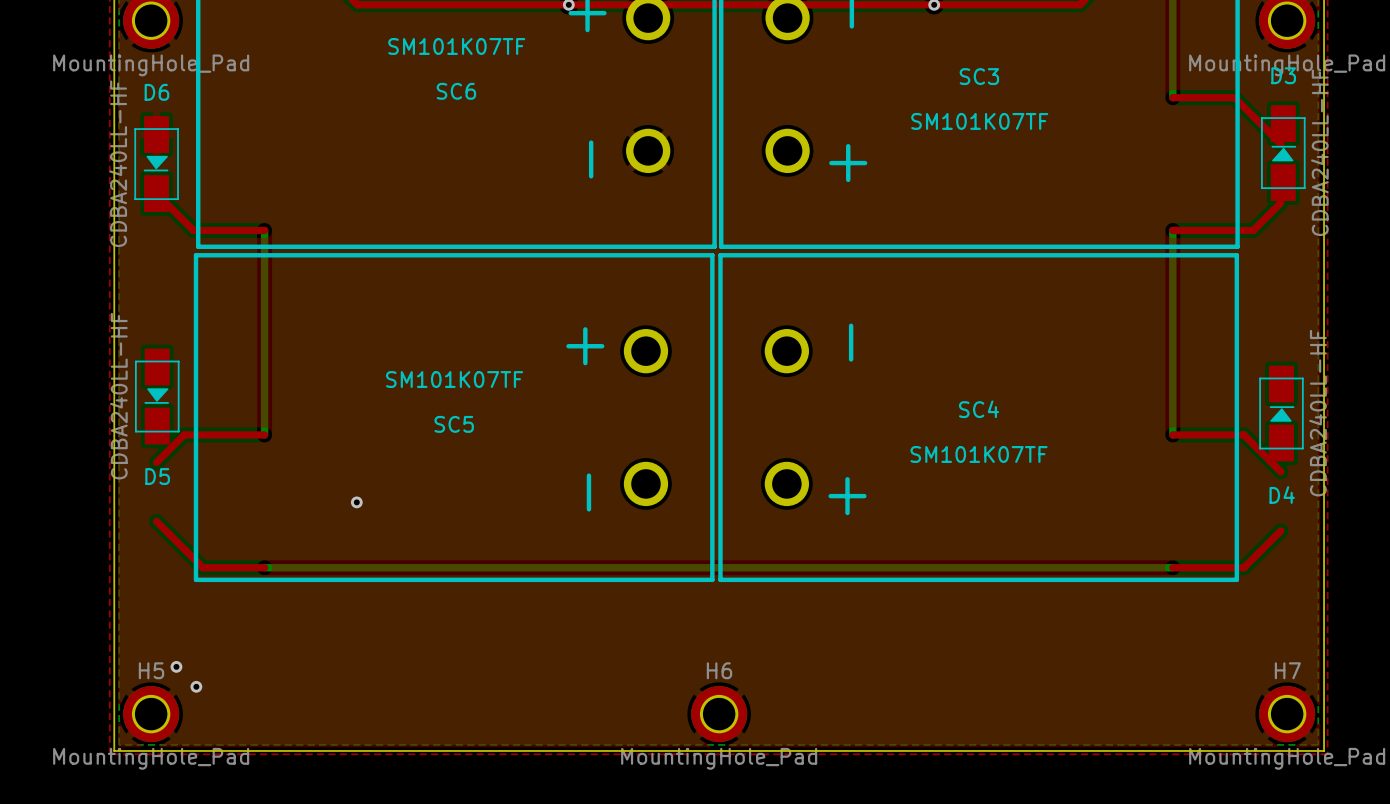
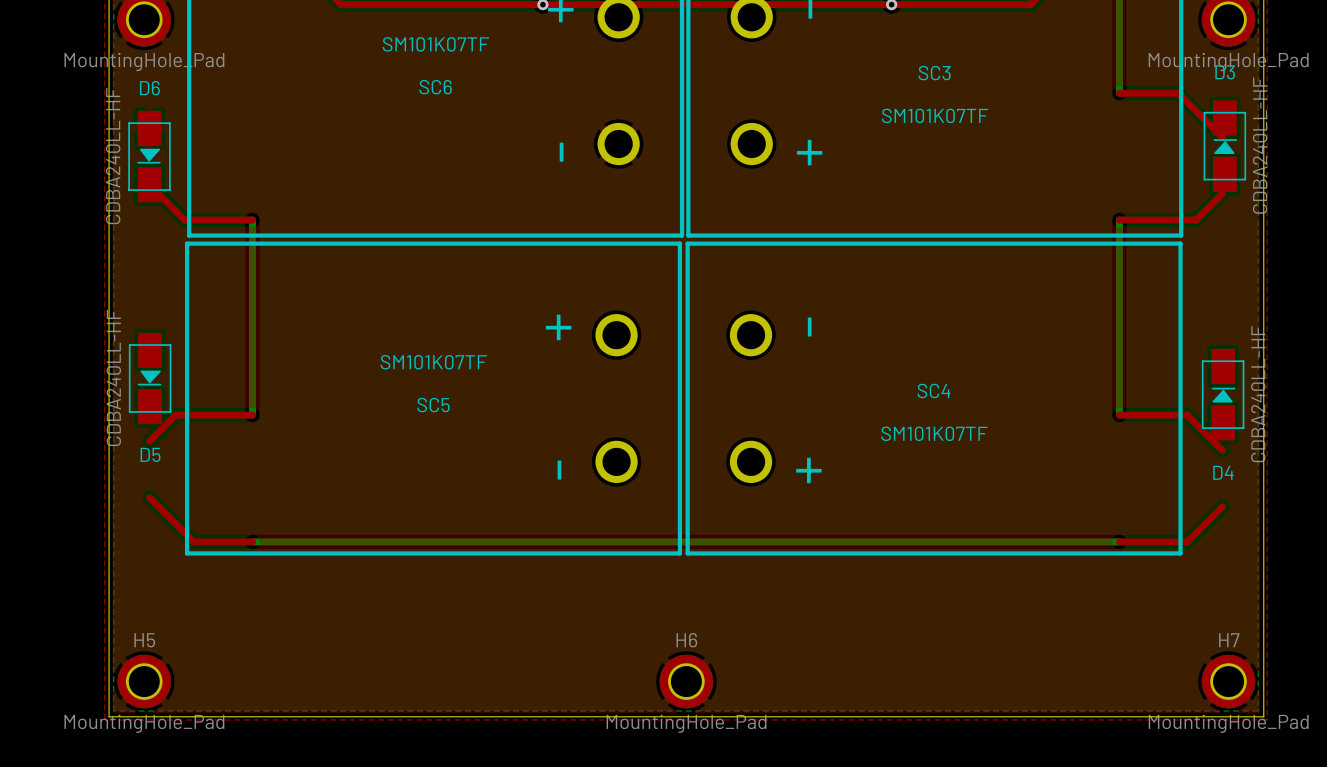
via: (356, 502) -> none
via: (176, 666) -> none
via: (196, 686) -> none

